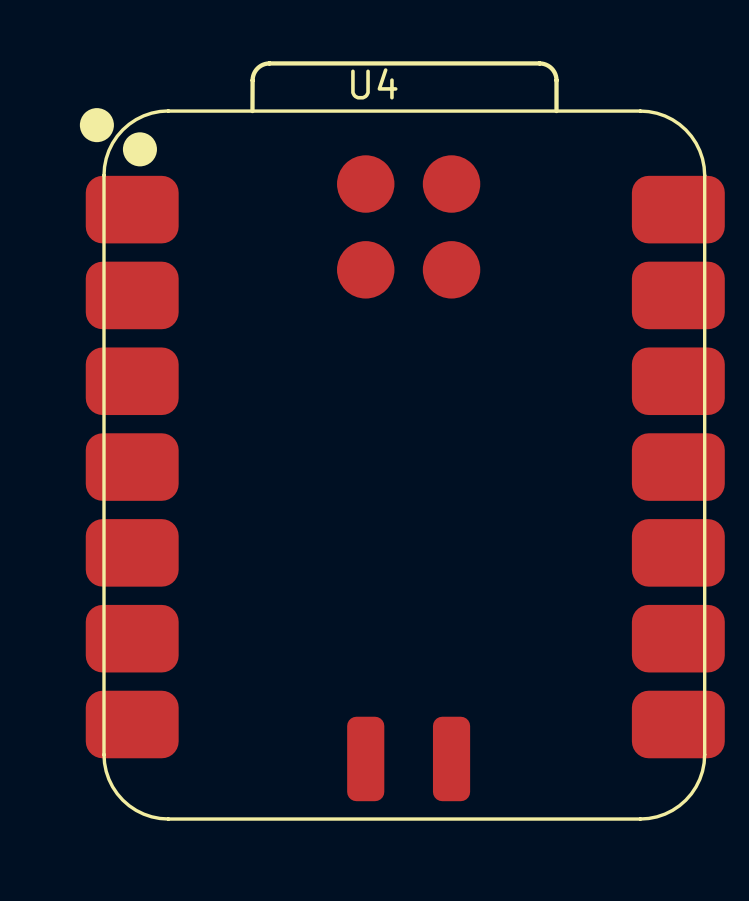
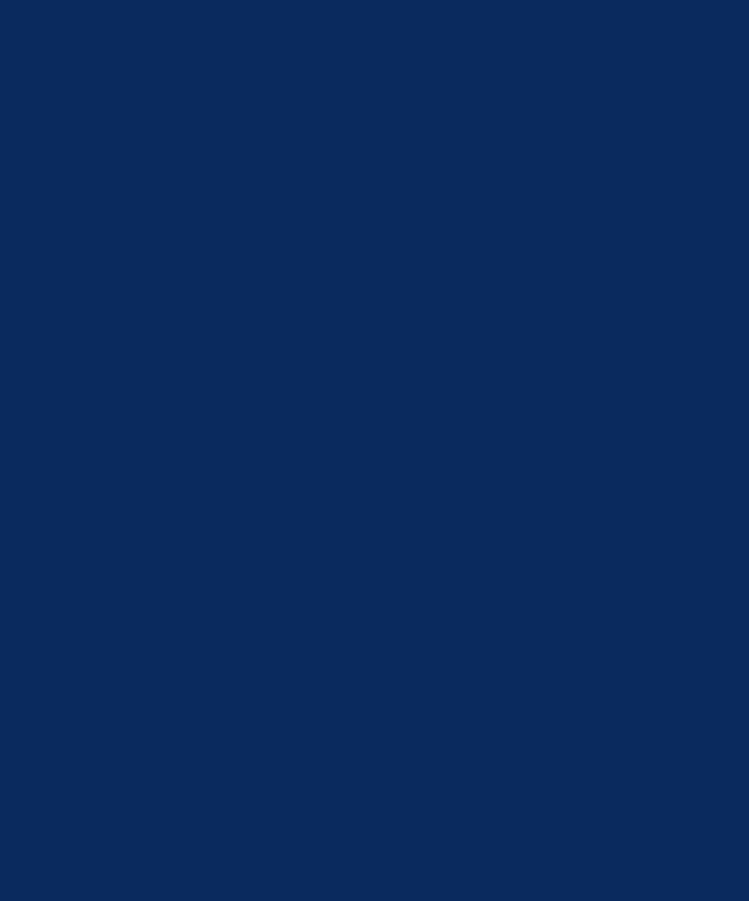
U4: (402, 441) -> none

